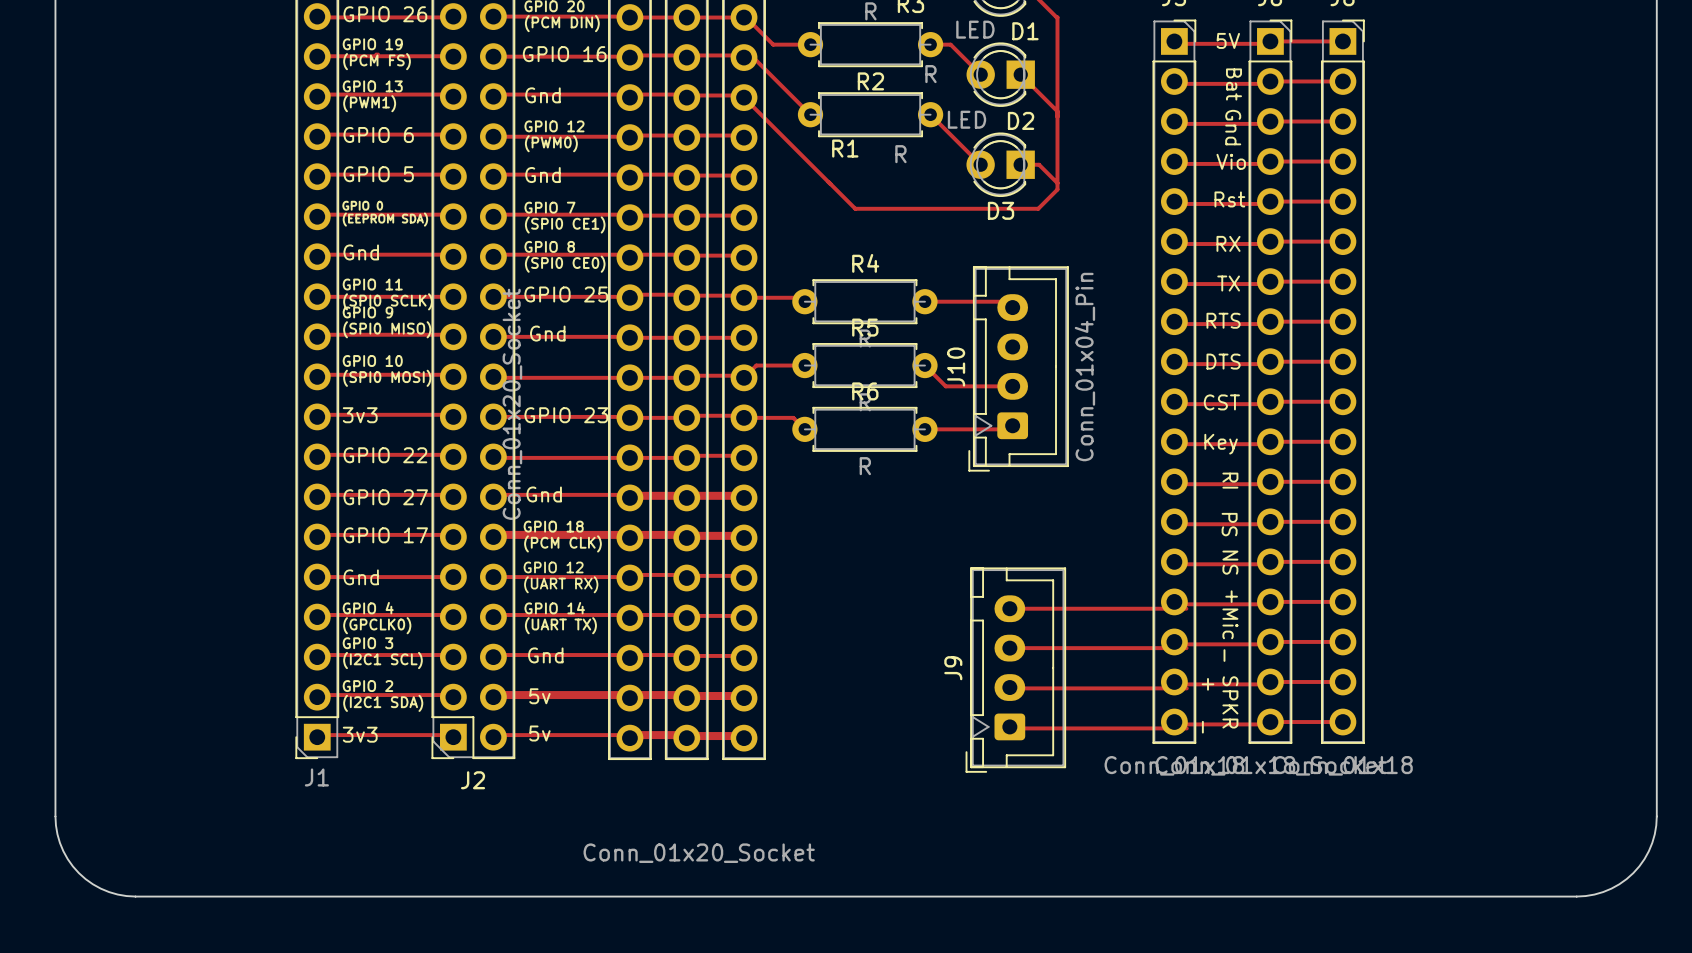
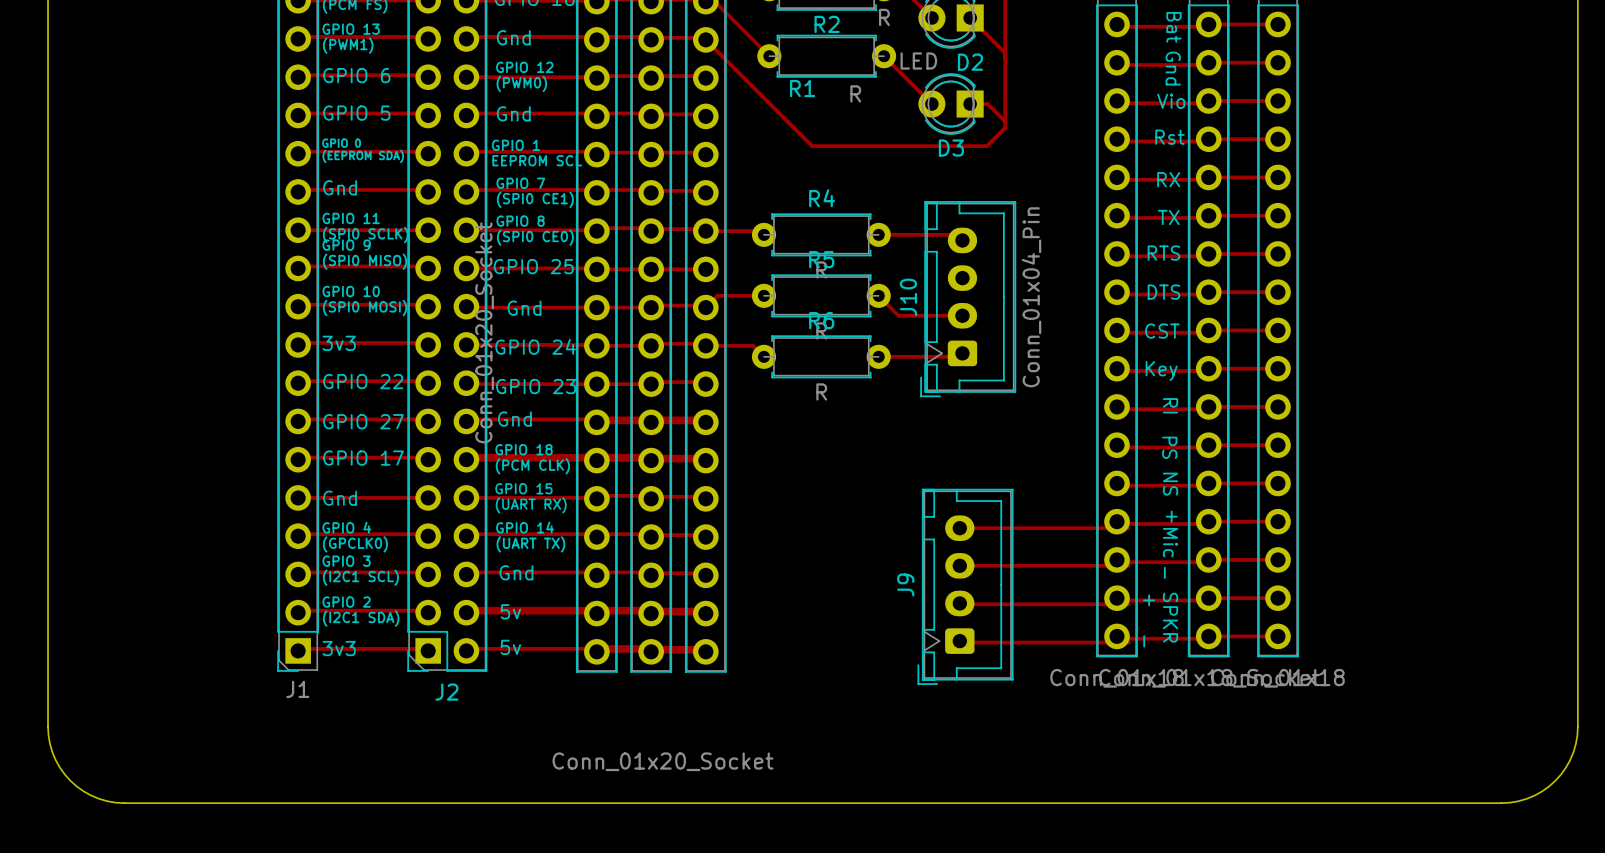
text: GPIO 7 (549, 207) -> GPIO 1 (516, 145)
text: (SPI0 CE1) (565, 224) -> none
text: none -> EEPROM SCL (537, 160)
text: GPIO 8 (549, 246) -> GPIO 7 (520, 183)
text: (SPI0 CE0) (565, 264) -> (SPI0 CE1) (535, 199)
text: none -> GPIO 8 (520, 221)
text position: GPIO 25 (566, 294) -> GPIO 25 (533, 266)
text: none -> (SPI0 CE0) (535, 237)
text position: Gnd (547, 333) -> Gnd (524, 308)
text: GPIO 23 (566, 415) -> GPIO 24 (535, 346)
text: none -> GPIO 23 (536, 386)
text: GPIO 12 (553, 567) -> GPIO 15 (523, 488)

